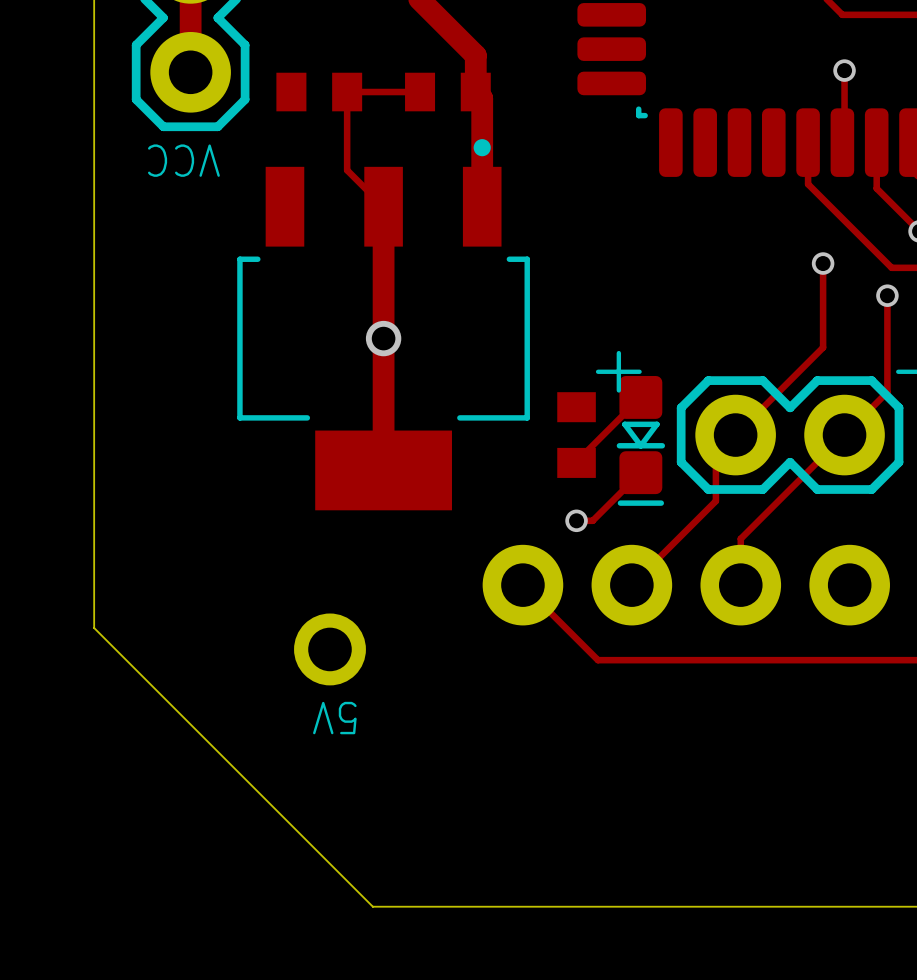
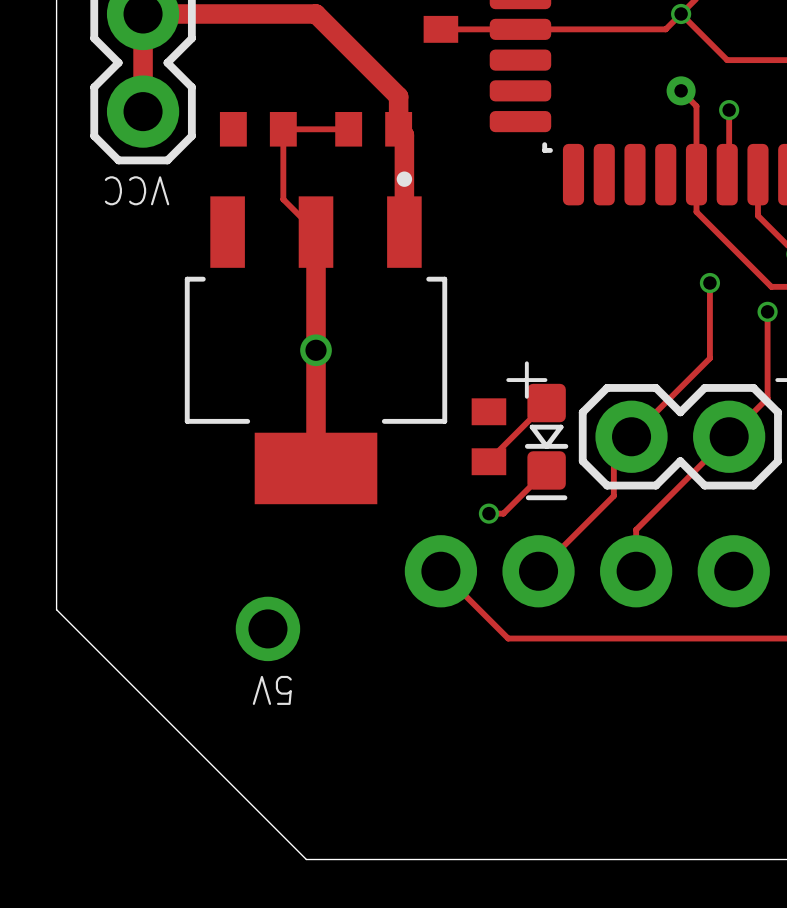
track: none -> (681, 90) (696, 106) (696, 174)
via: none -> (681, 90)

